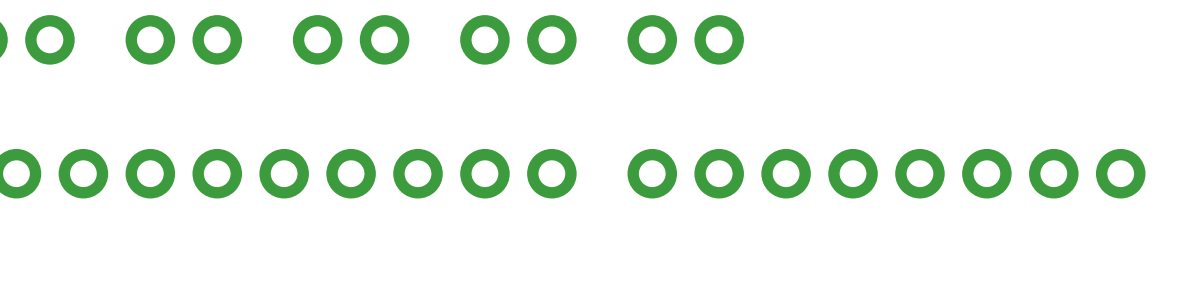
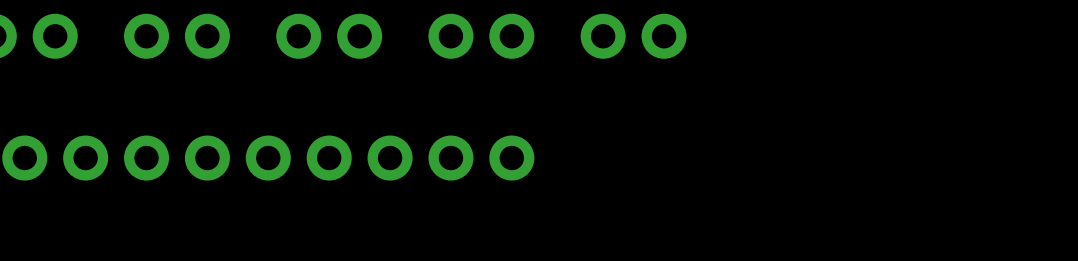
part: (886, 173) -> none

